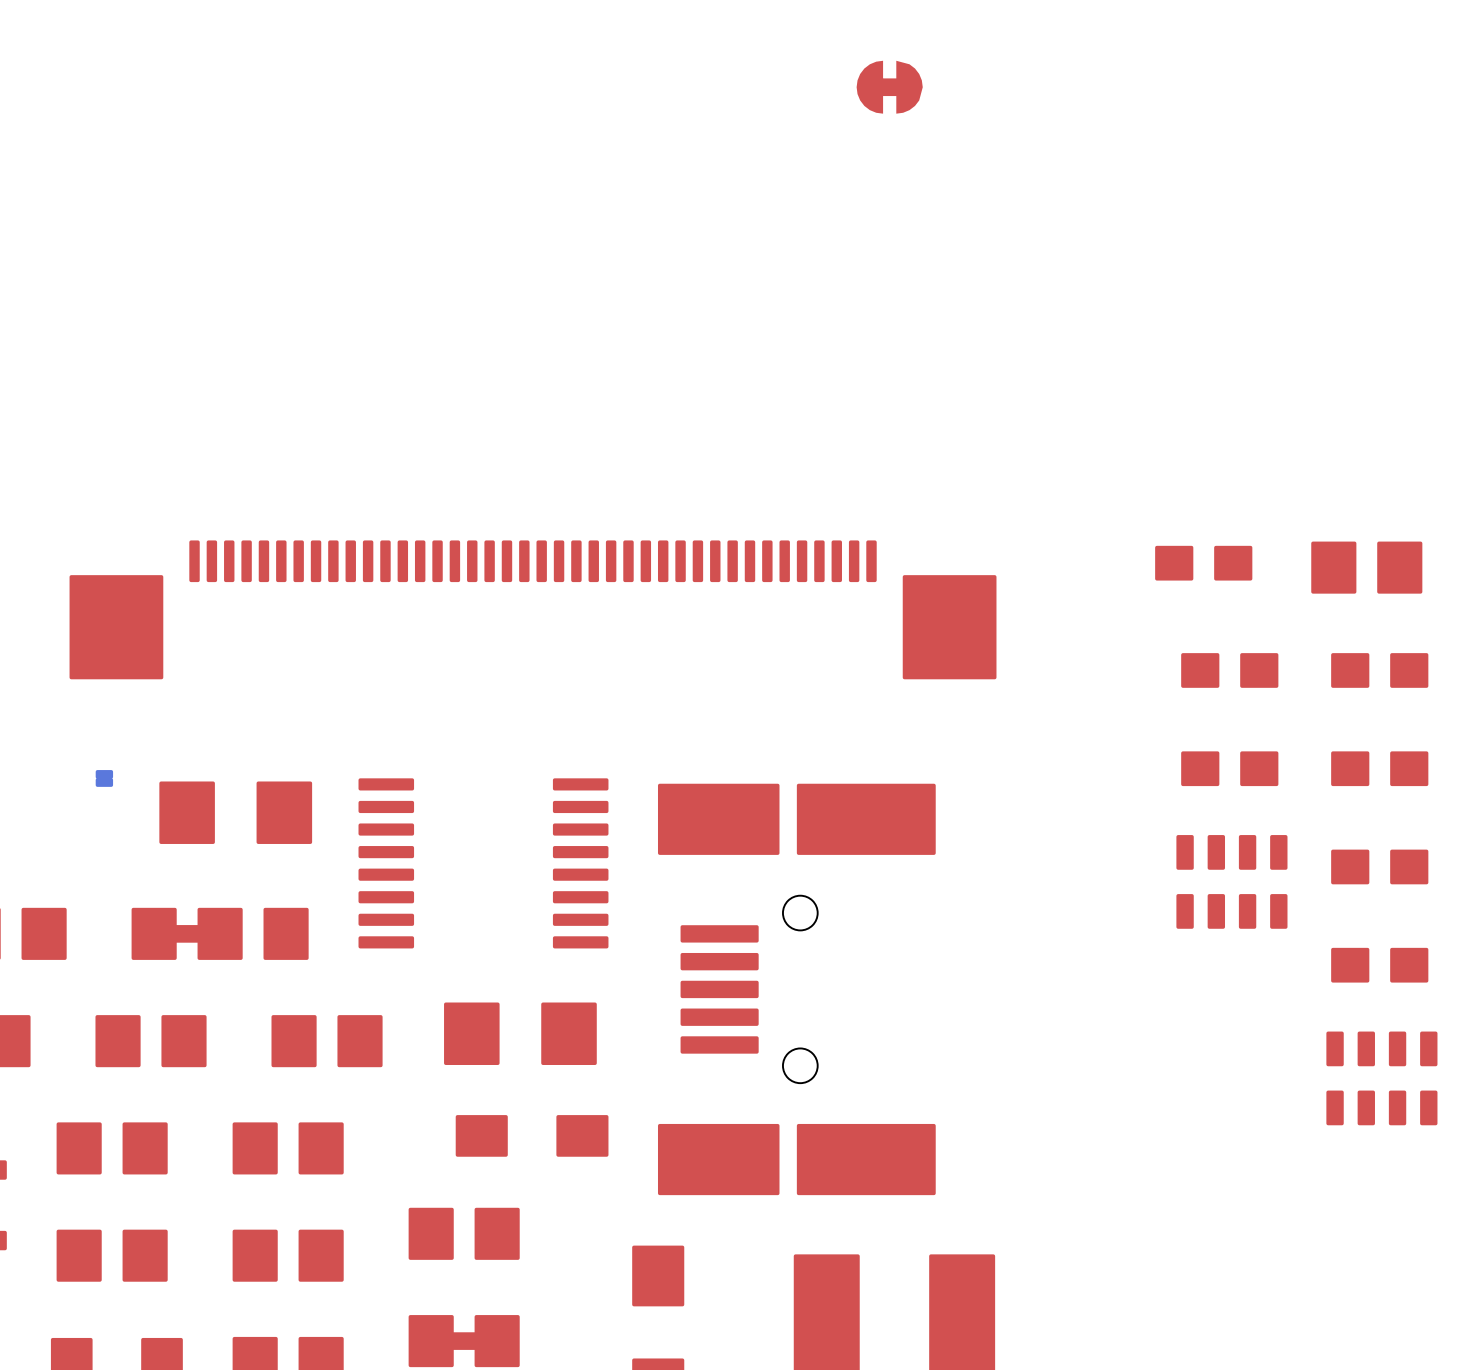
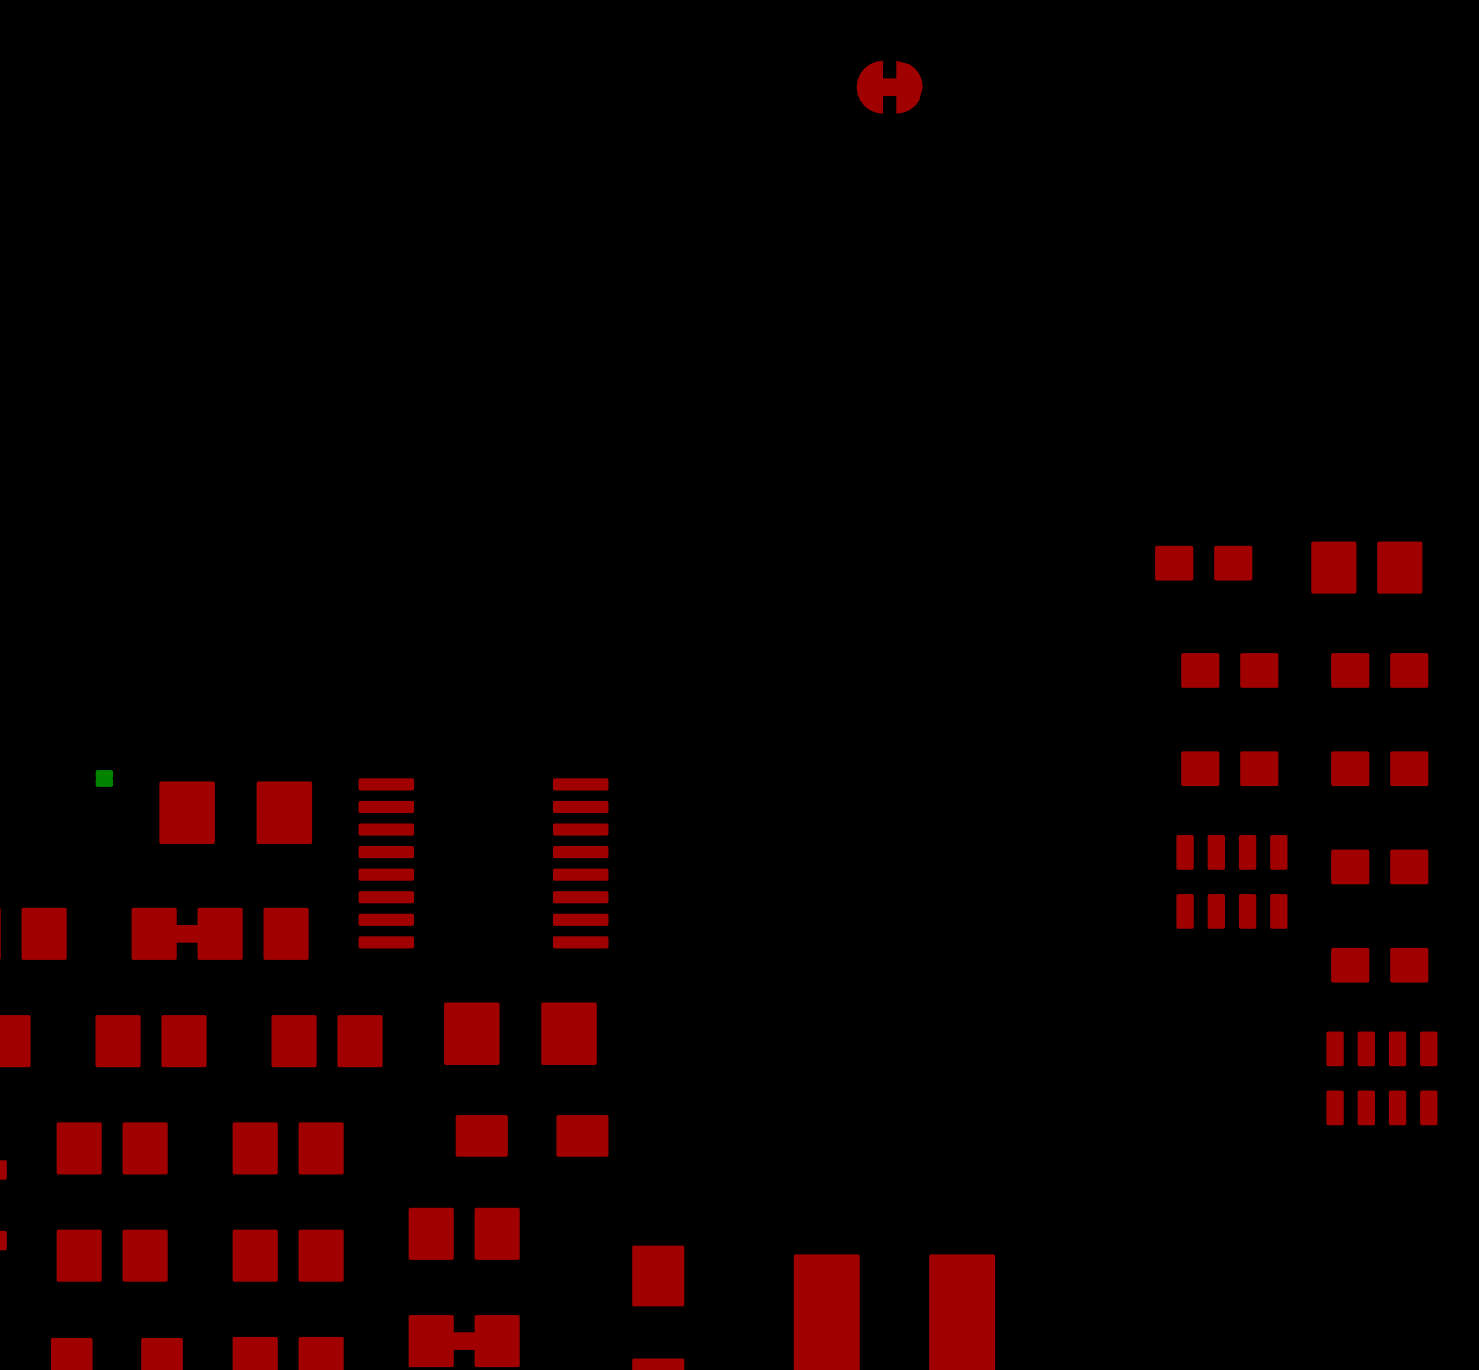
part: (533, 609) -> none
part: (796, 989) -> none

